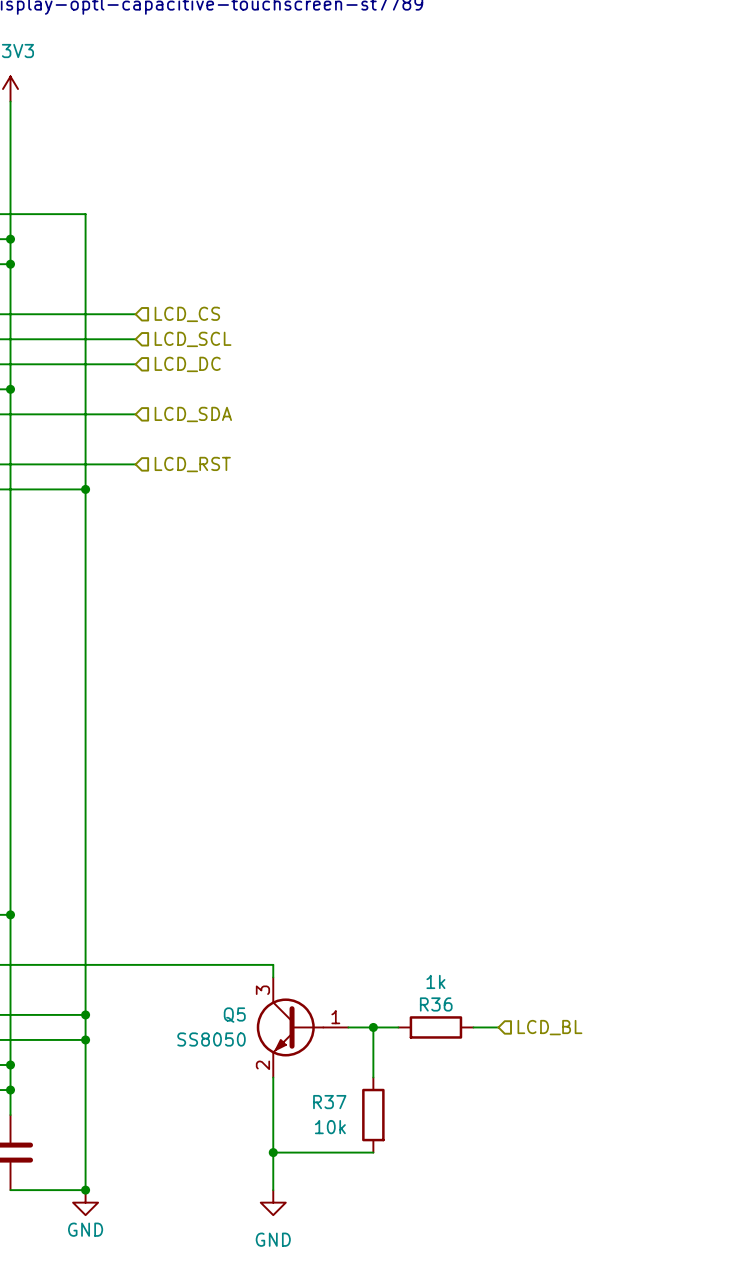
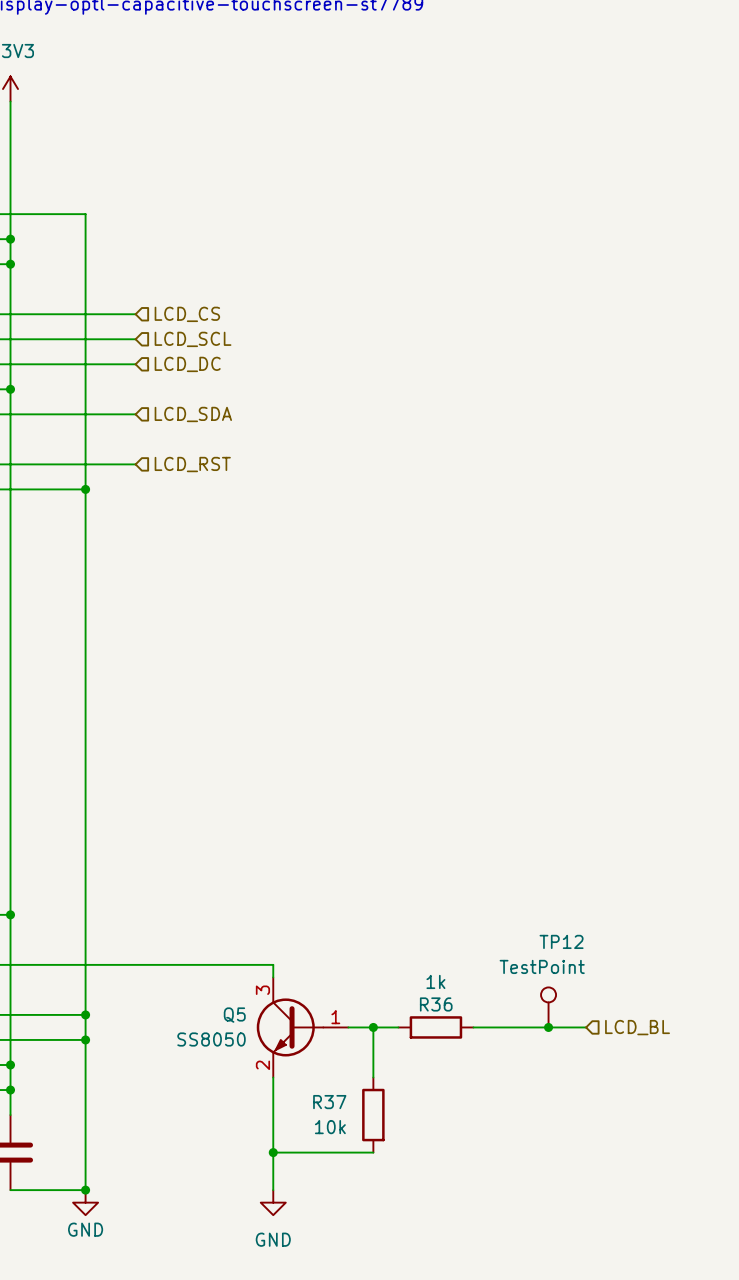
TP12: none -> TestPoint (548, 1007)
wire: none -> (498, 1027) (586, 1027)
junction: none -> (548, 1027)
hierarchical label position: LCD_BL (549, 1027) -> LCD_BL (637, 1027)

